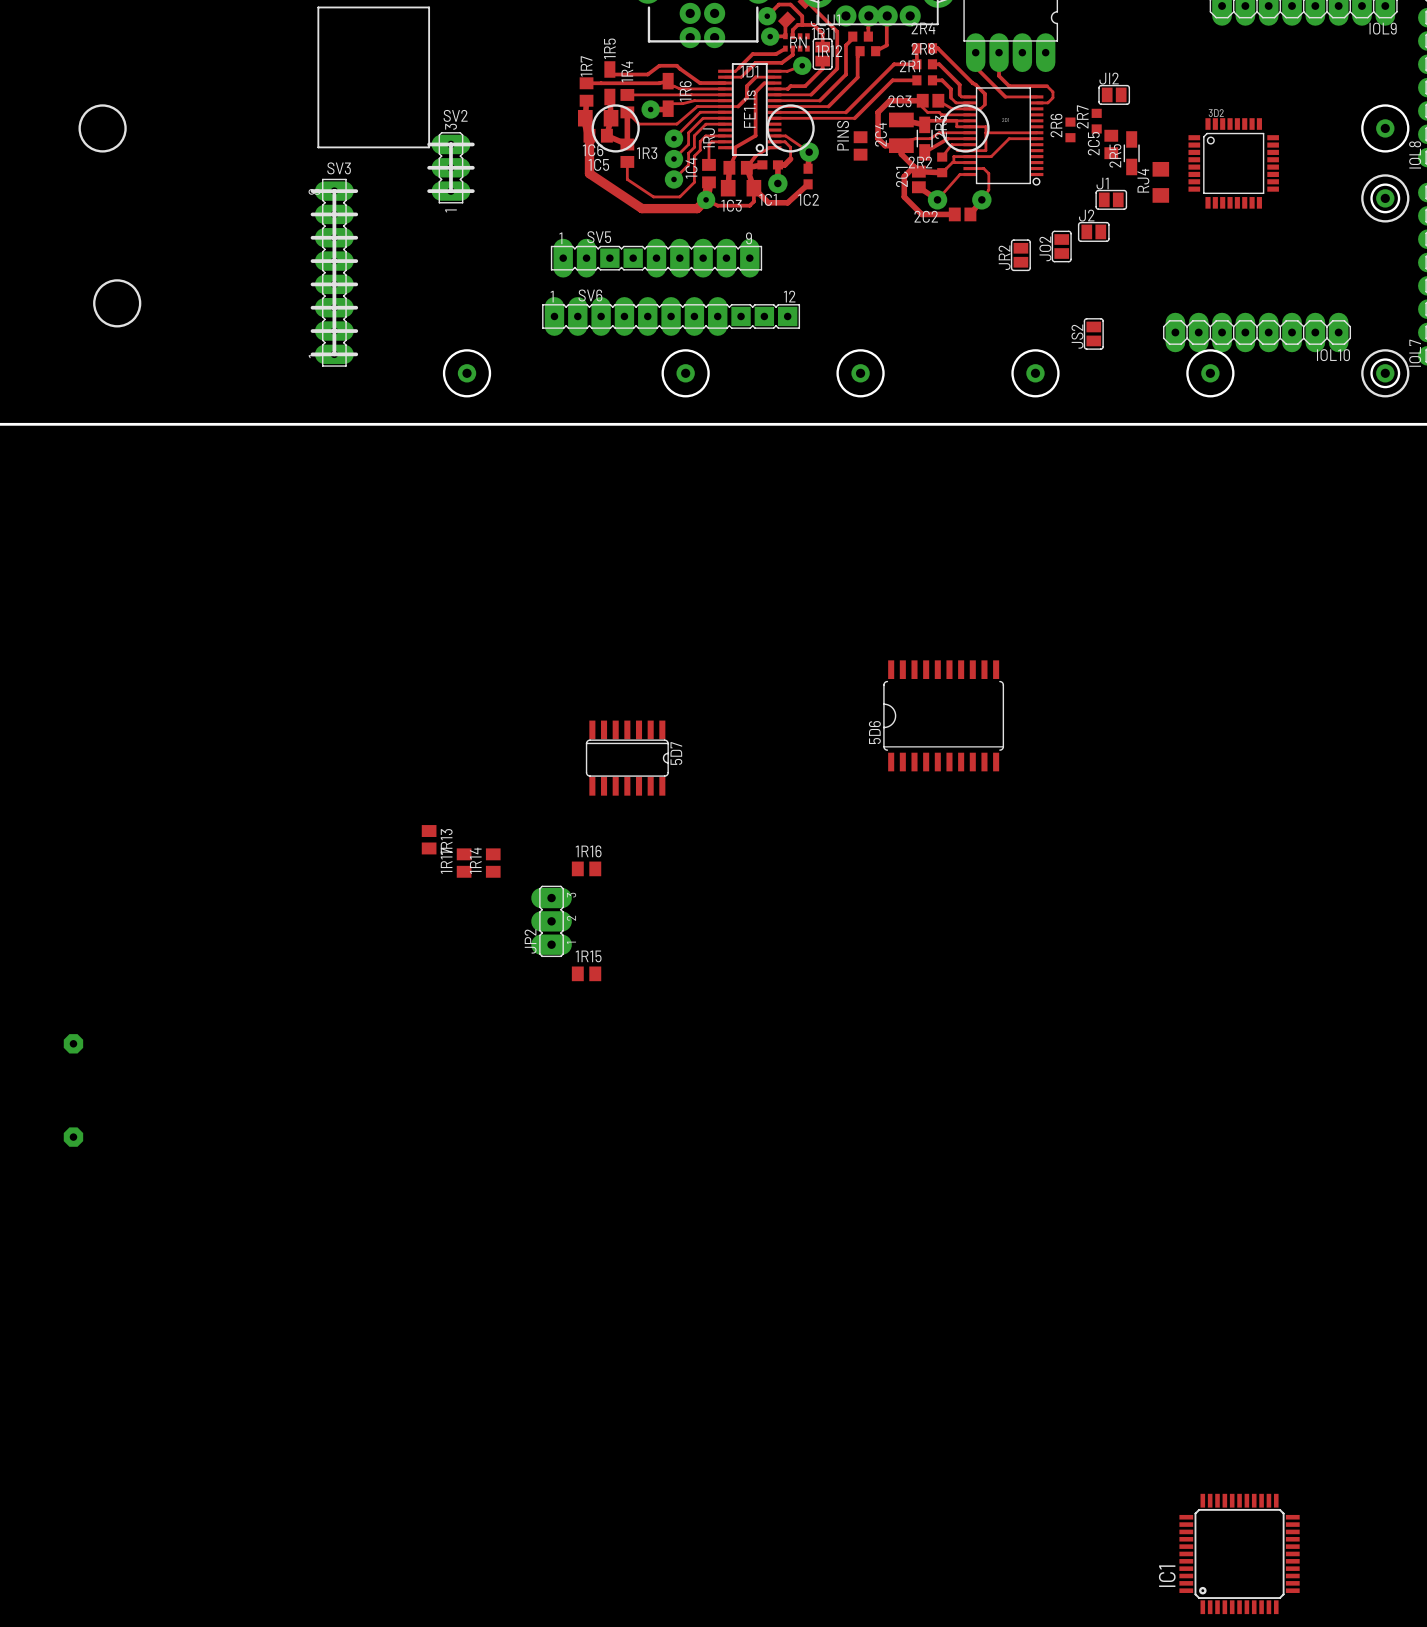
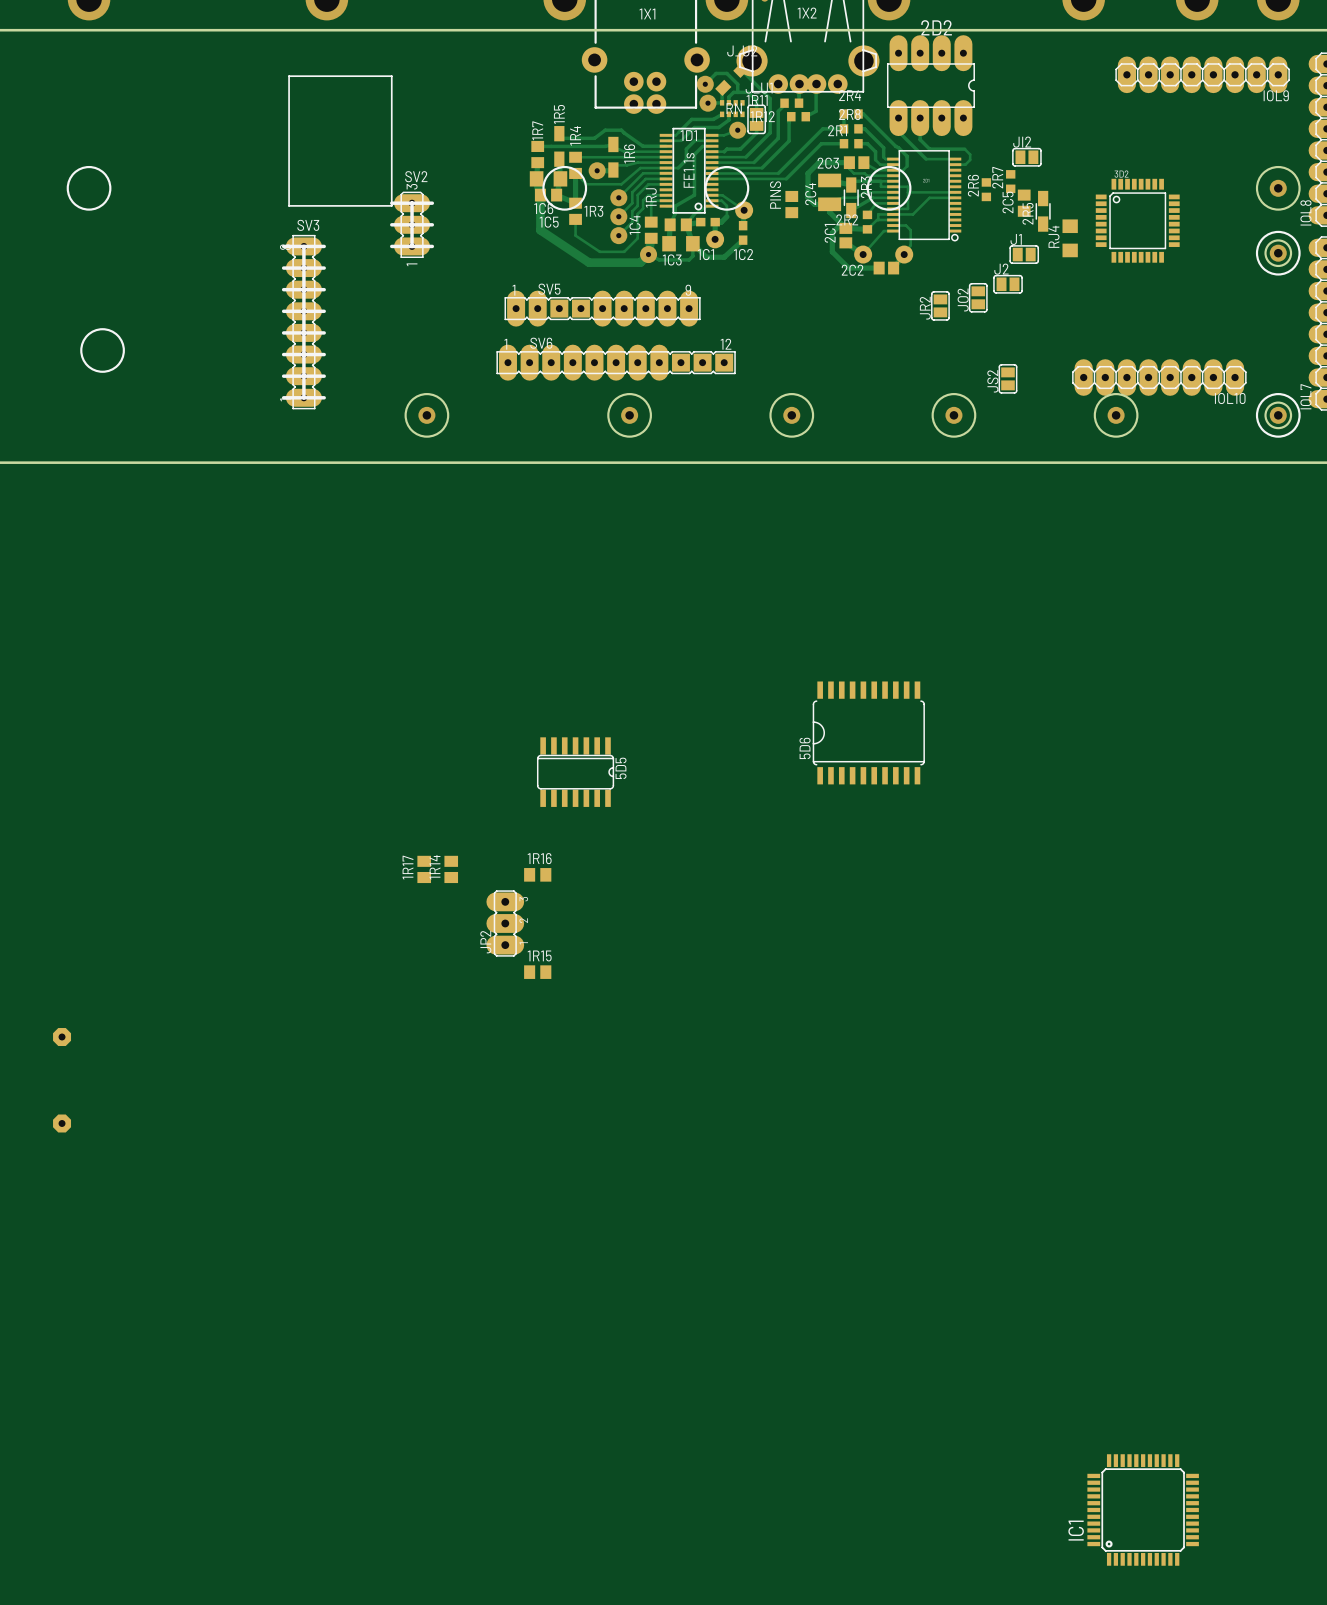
5D7 name: 5D7 (676, 753) -> 5D5 (621, 768)
1R13: (429, 839) -> none

